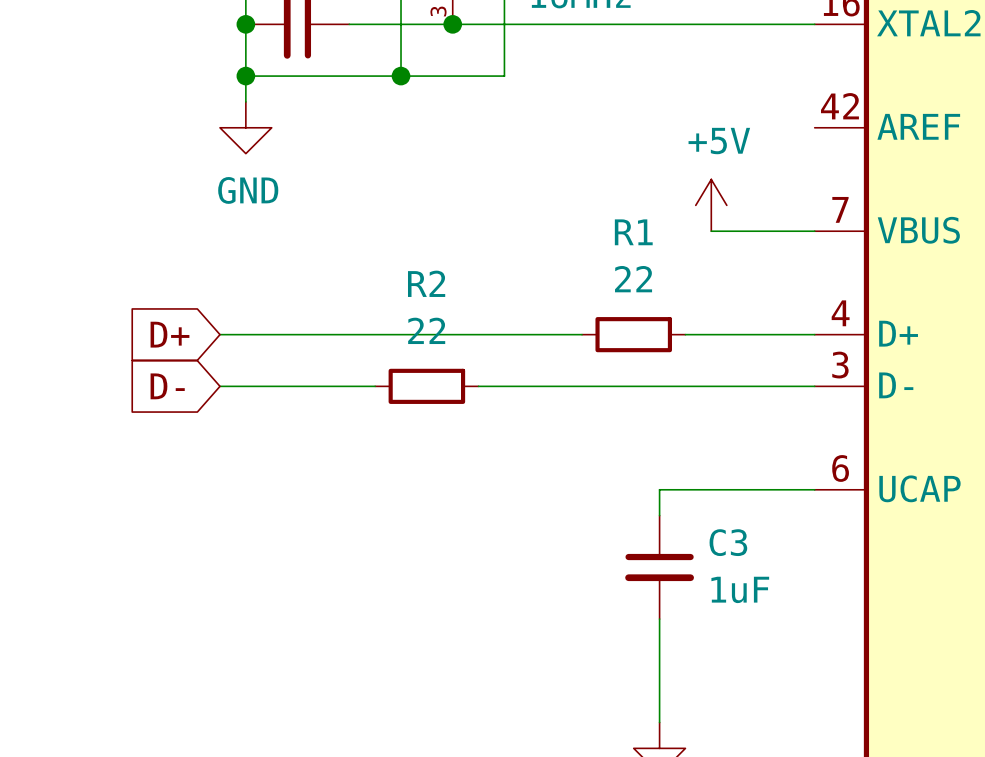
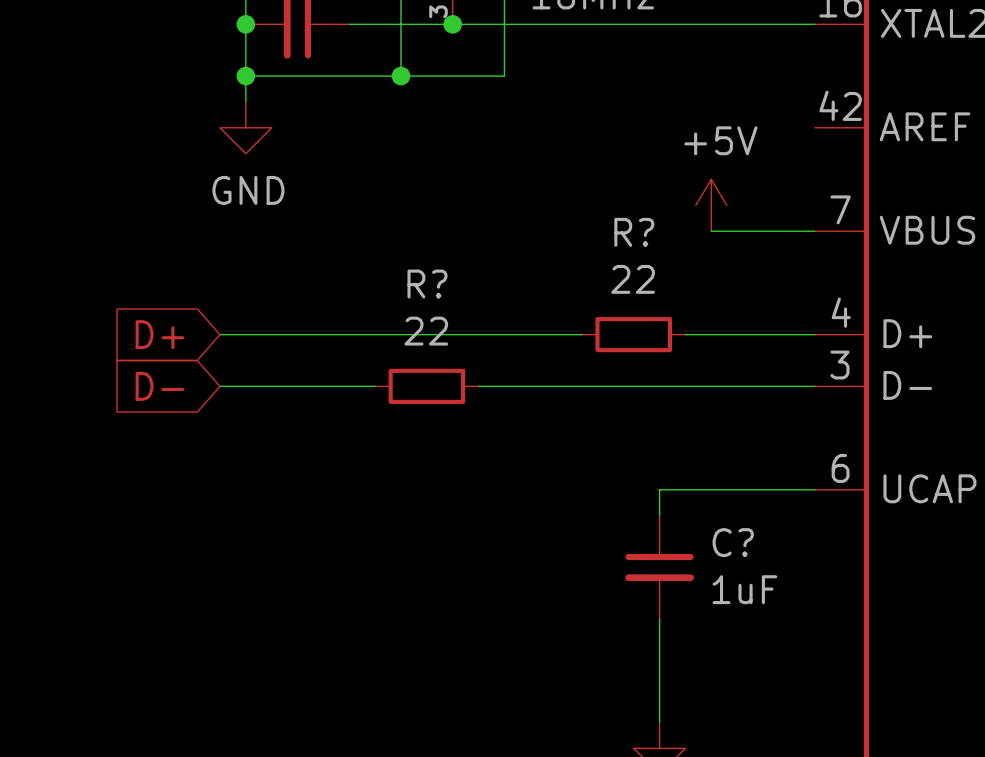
R1 name: R1 (633, 232) -> R? (634, 232)
R2 name: R2 (426, 283) -> R? (427, 284)
C3 name: C3 (728, 542) -> C? (733, 542)

